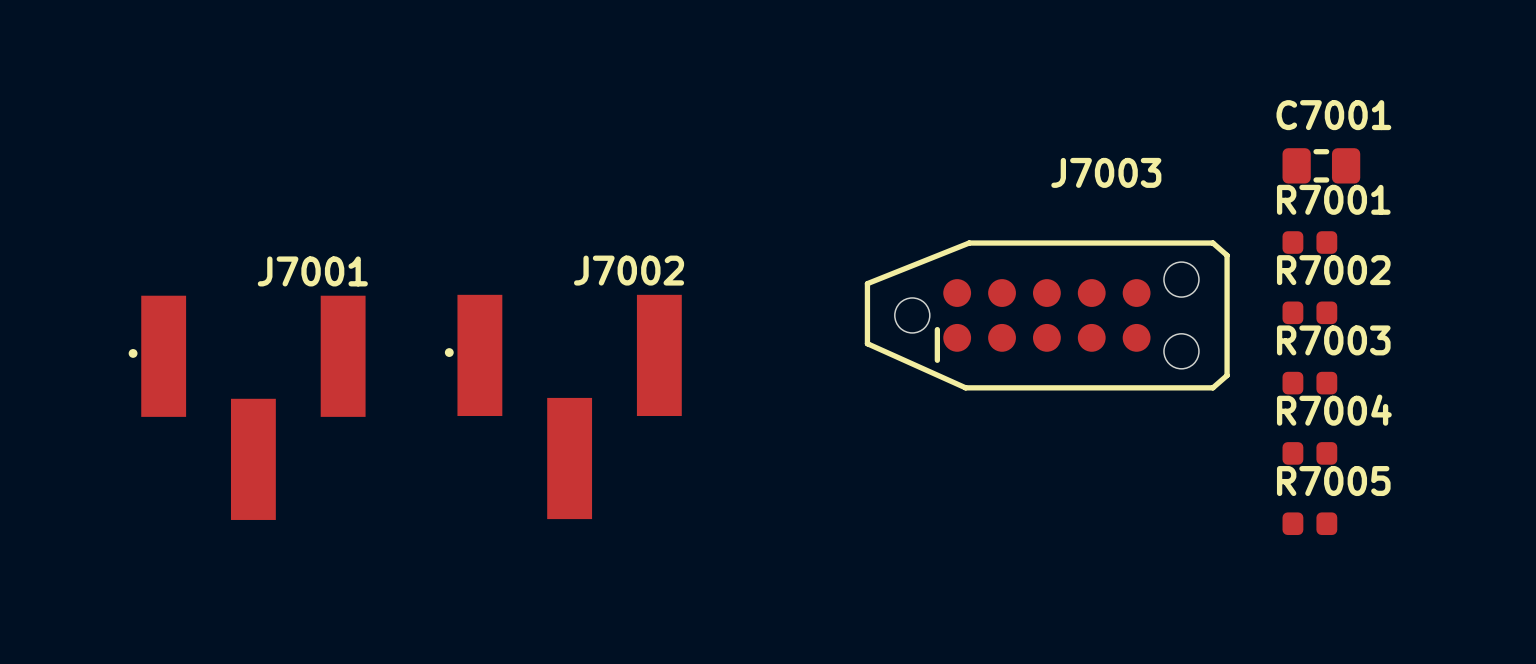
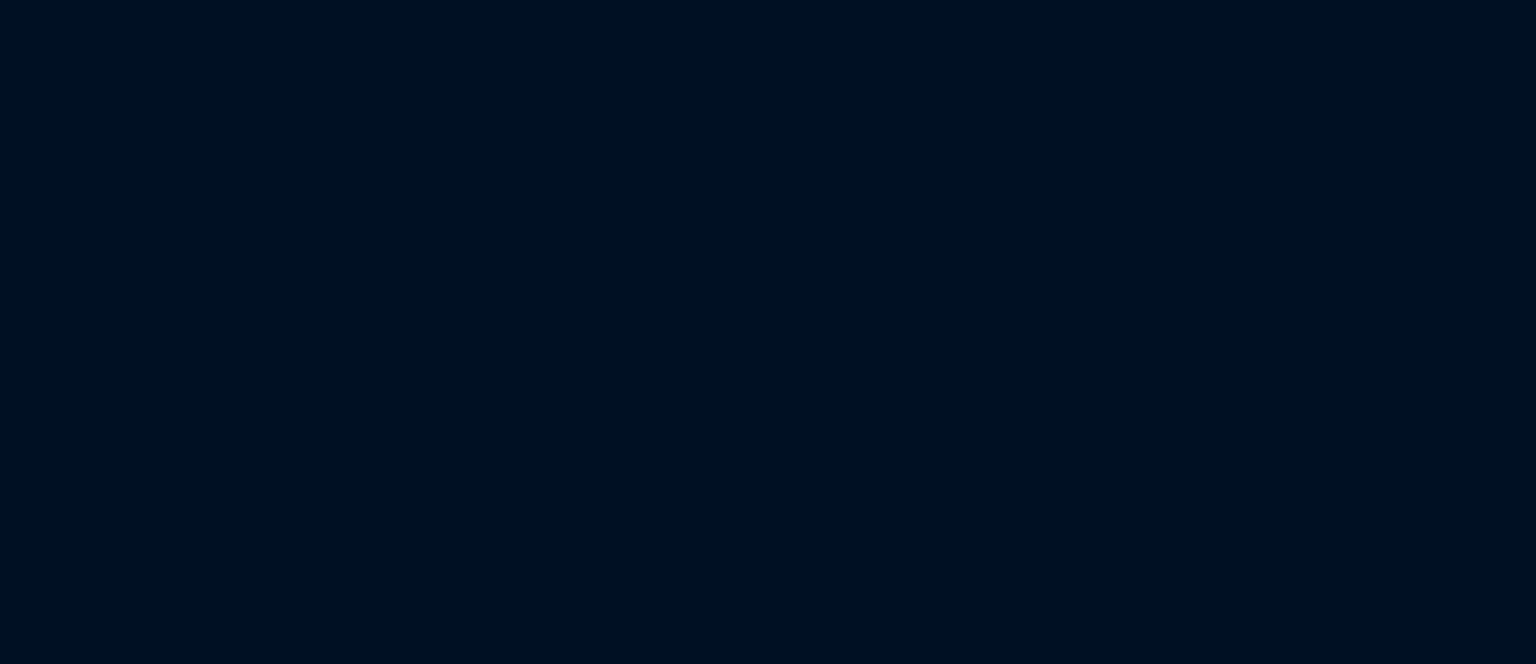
C7001: (1321, 165) -> none
R7001: (1309, 242) -> none
R7002: (1309, 312) -> none
J7003: (1047, 315) -> none
R7003: (1309, 383) -> none
J7002: (563, 406) -> none
J7001: (247, 407) -> none
R7004: (1309, 453) -> none
R7005: (1309, 523) -> none

